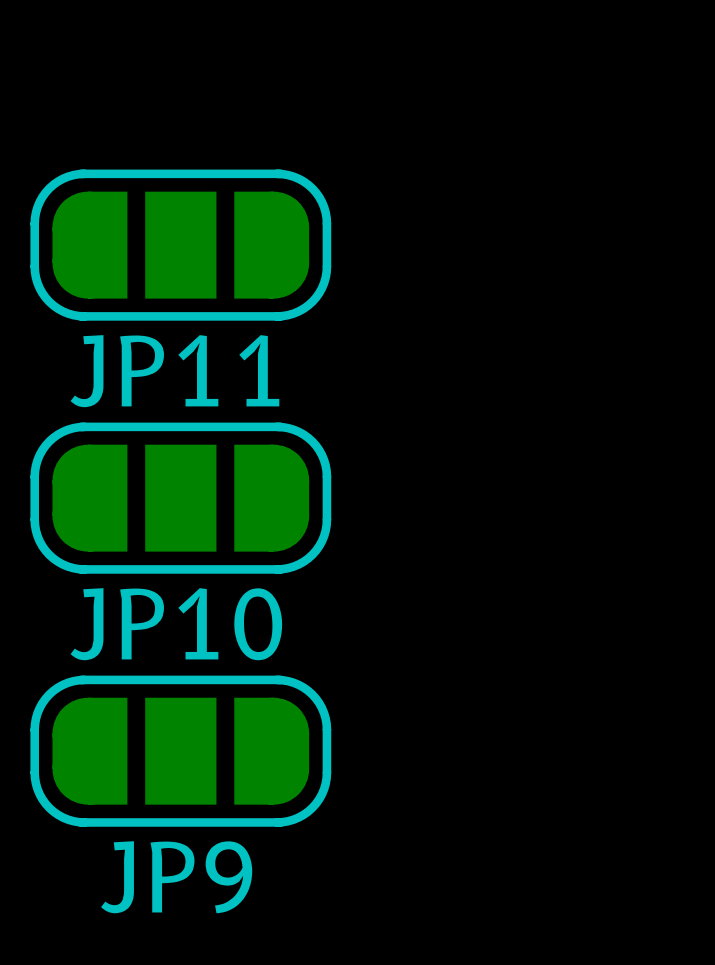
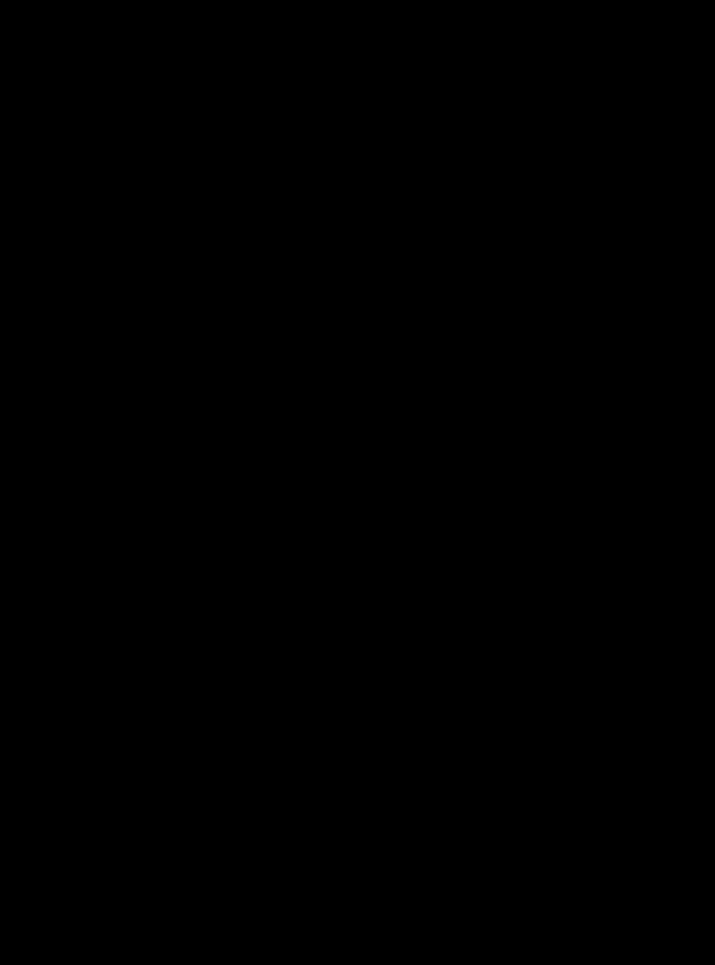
JP11: (180, 245) -> none
JP10: (180, 498) -> none
JP9: (180, 751) -> none

